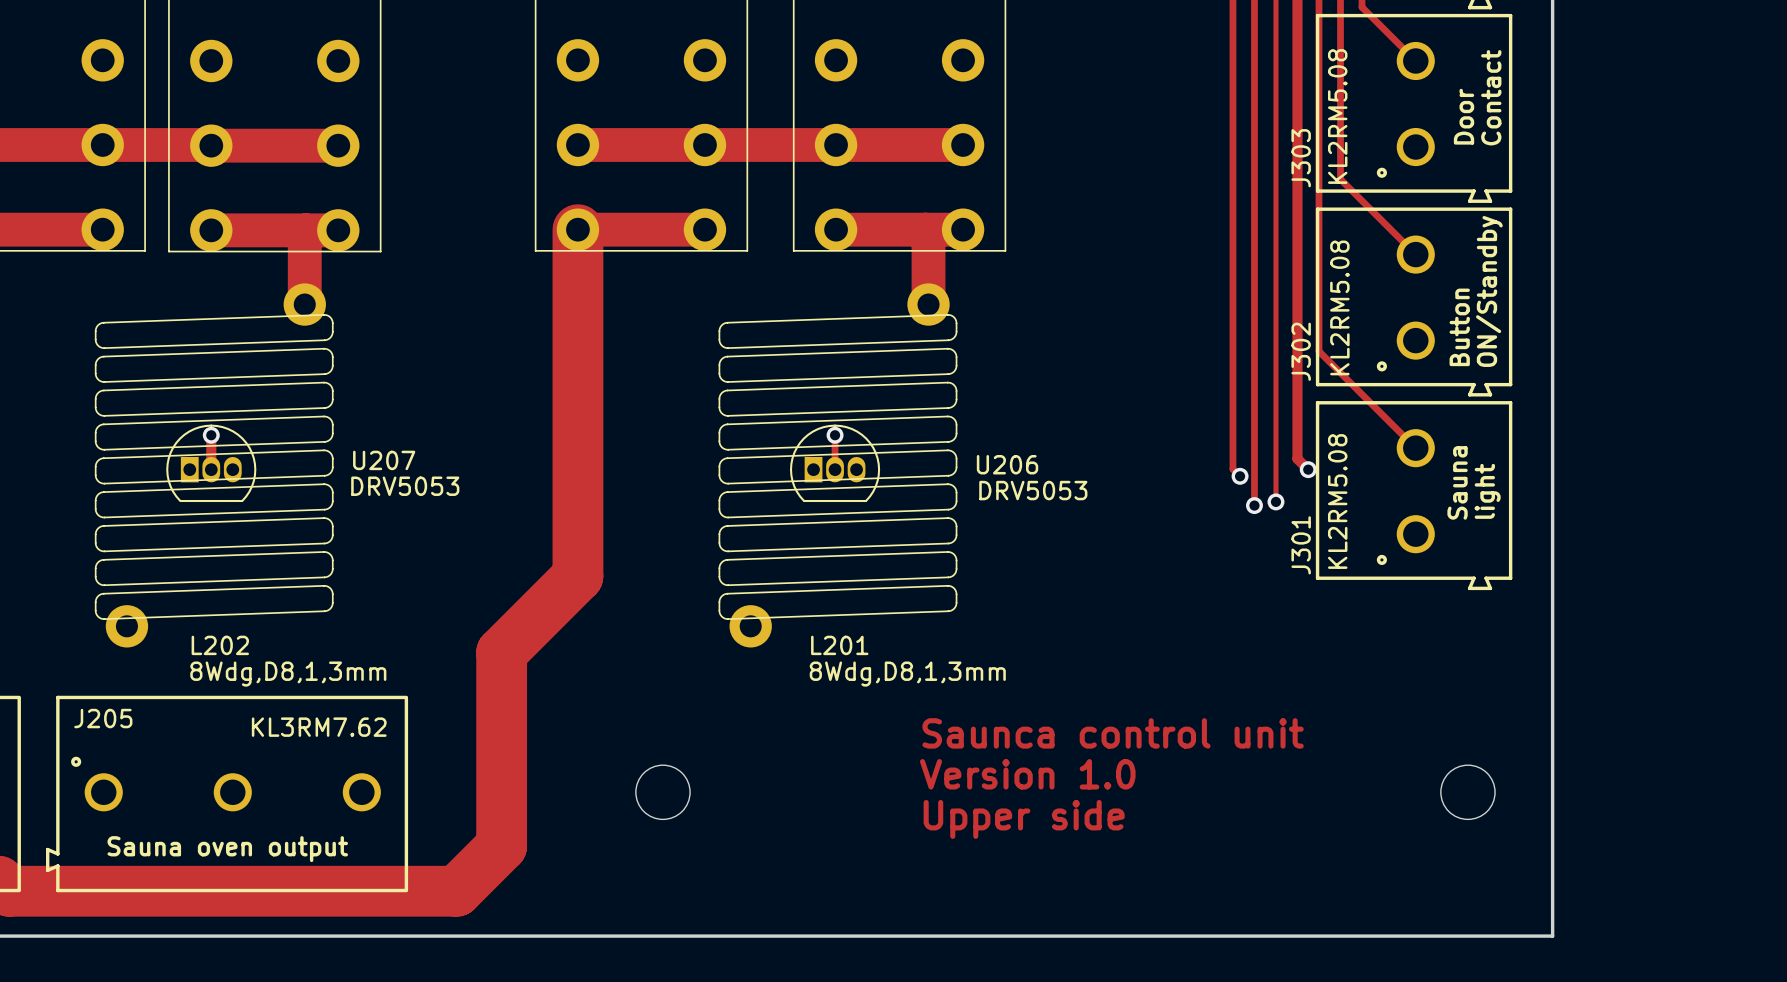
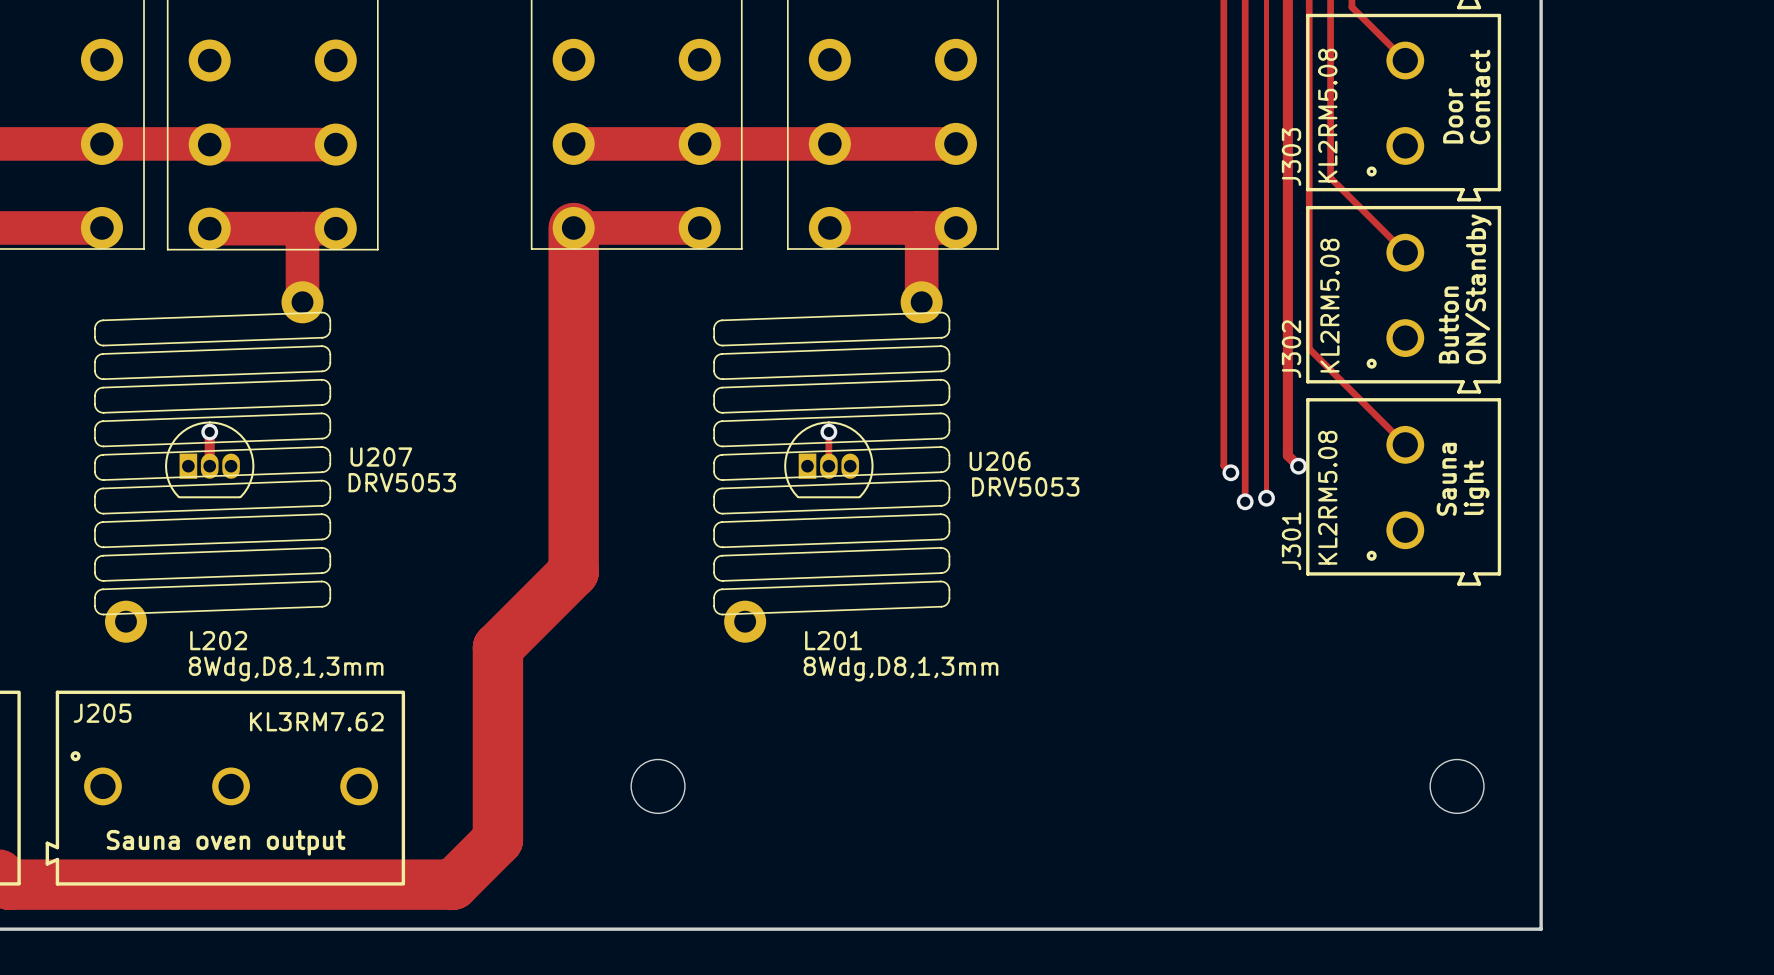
text: Saunca control unit (1113, 733) -> none
text: Version 1.0 (1027, 774) -> none
text: Upper side (1024, 819) -> none

